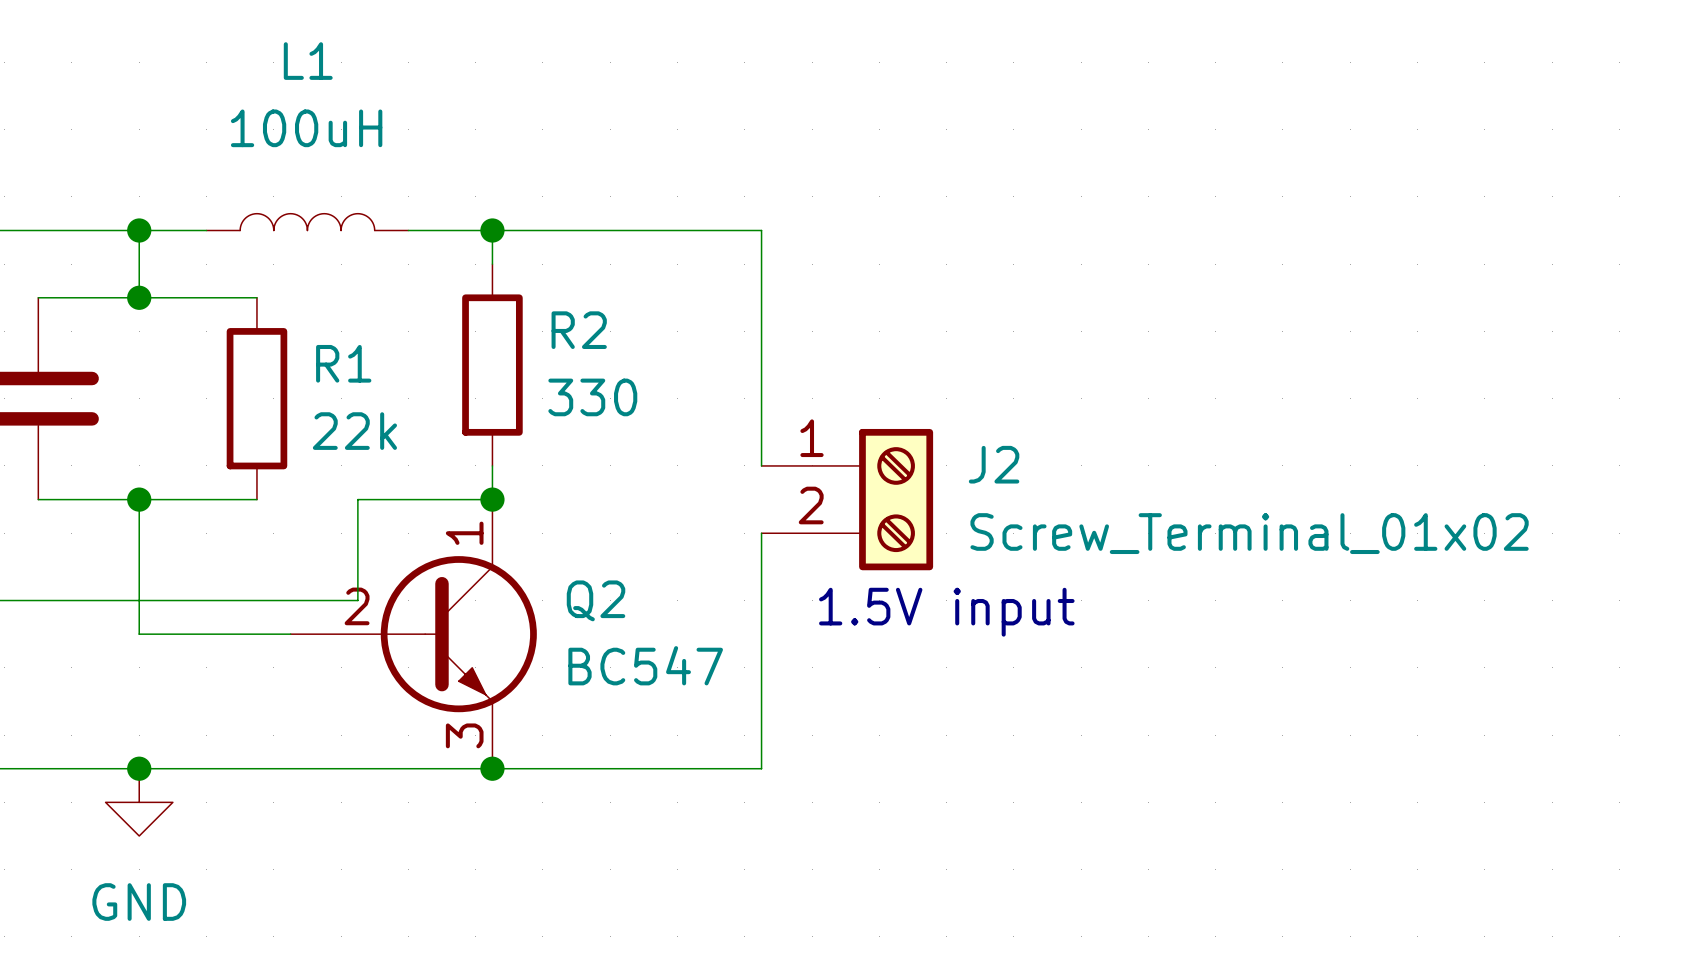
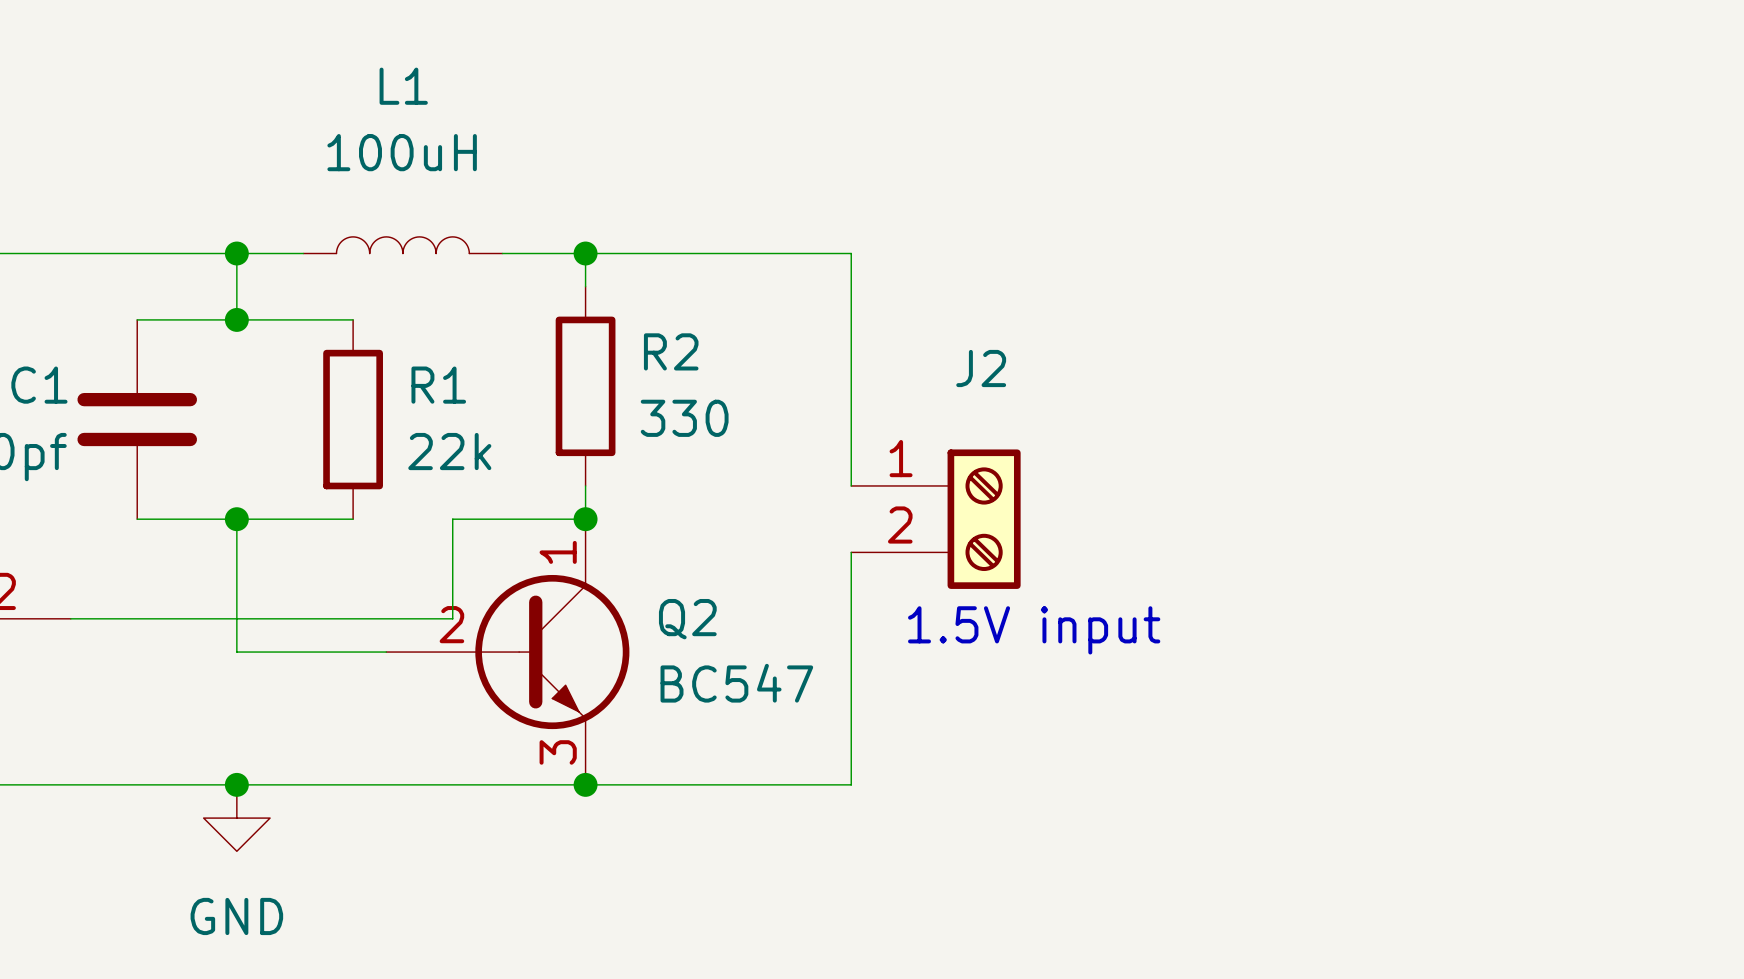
J2 name position: J2 (994, 464) -> J2 (981, 368)
J2 value: Screw_Terminal_01x02 (1249, 533) -> none

